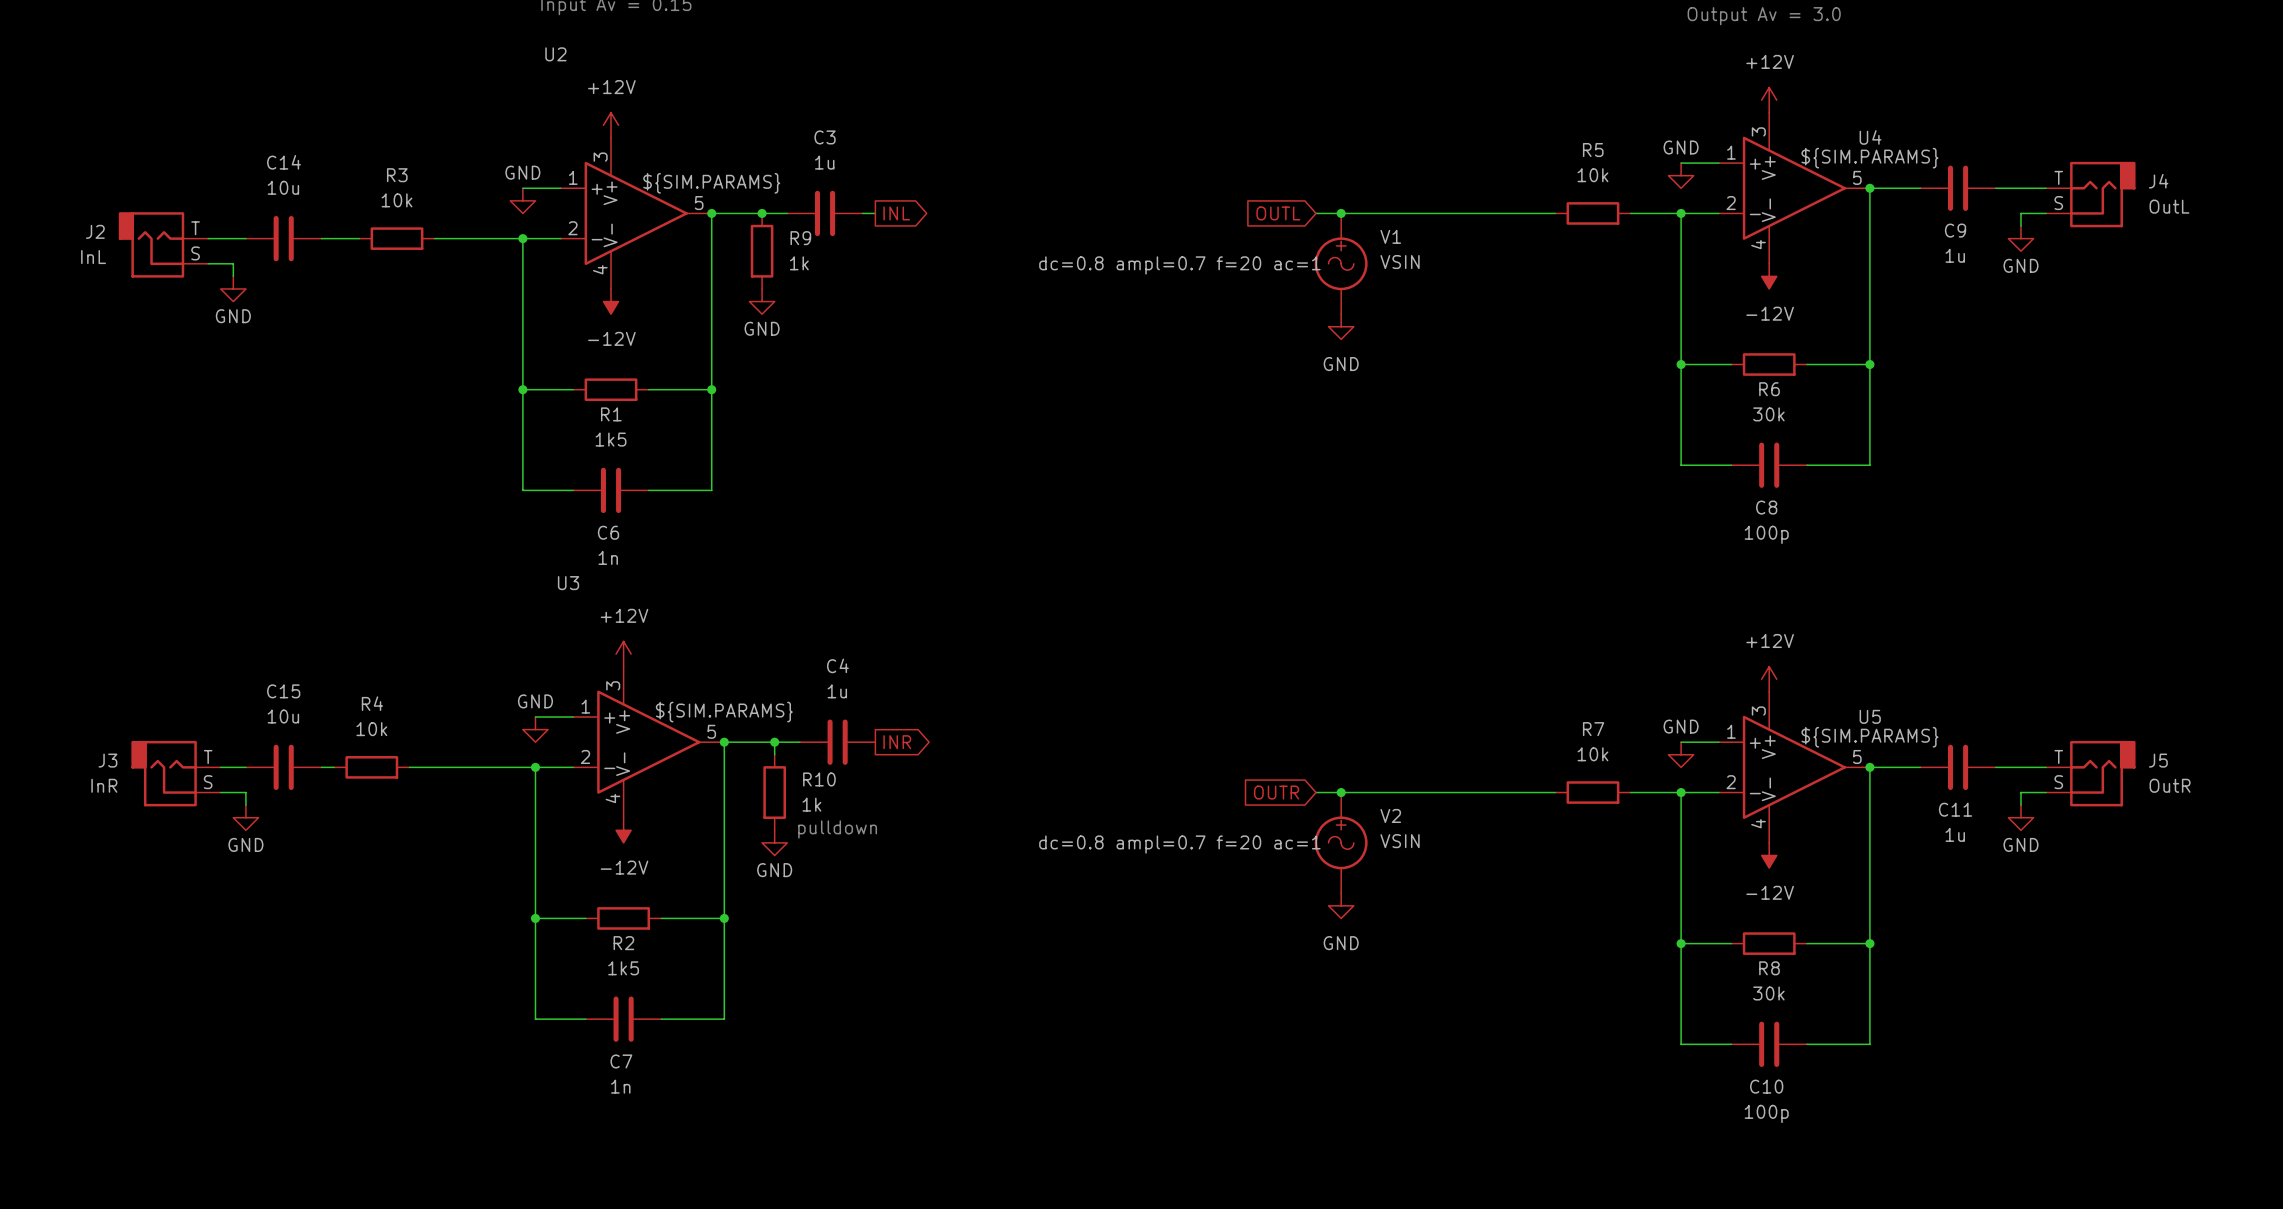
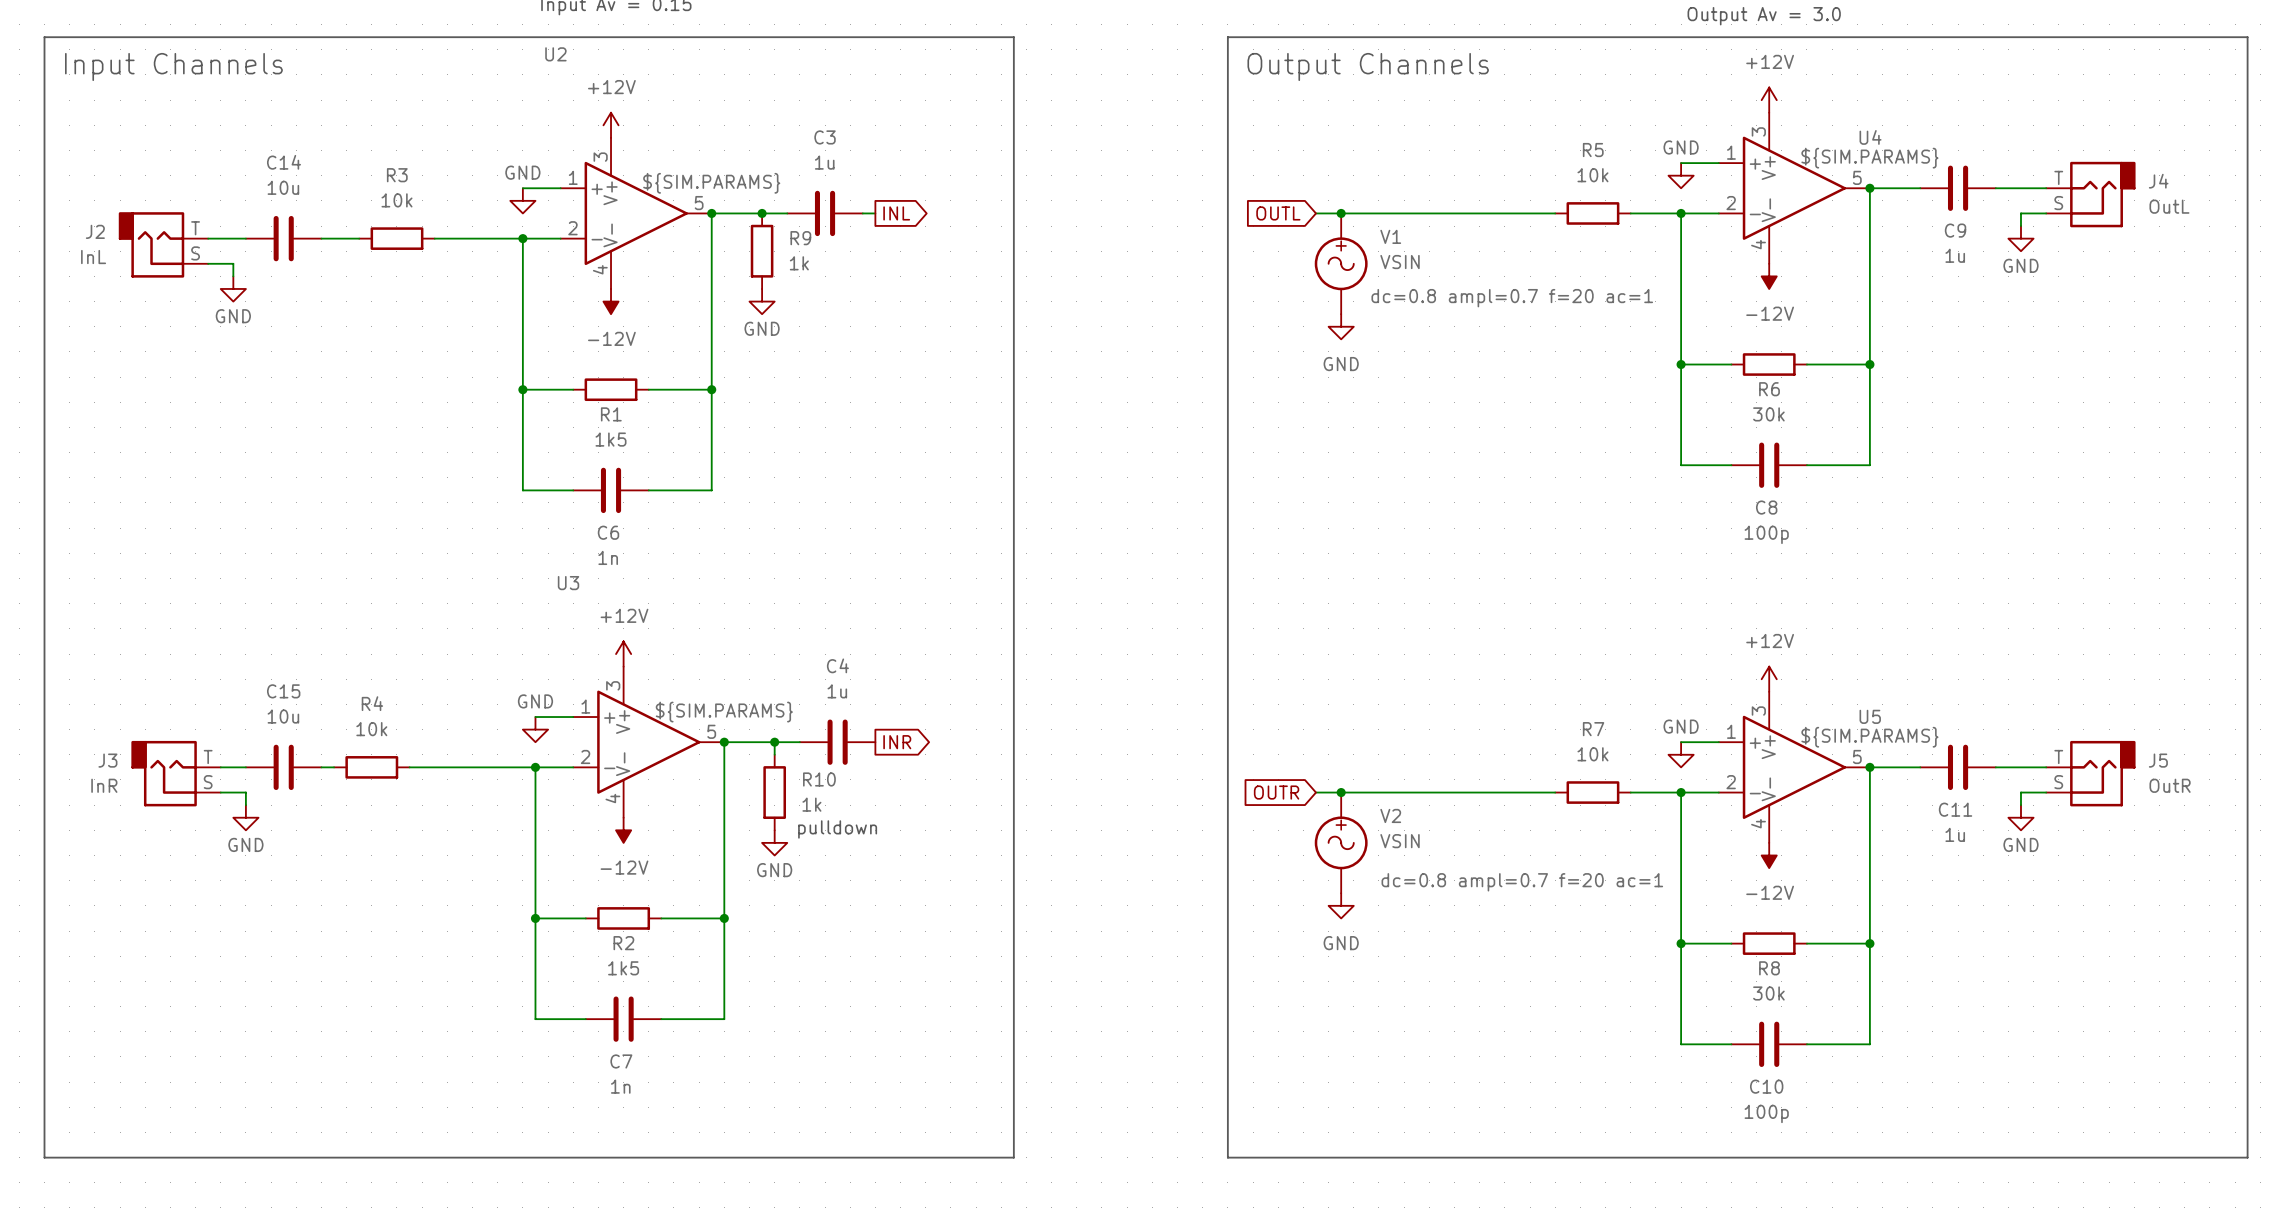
line: none -> (44, 37) (1013, 37) (1013, 1157) (44, 1157) (44, 37)
line: none -> (1227, 37) (2247, 37) (2247, 1157) (1227, 1157) (1227, 37)
text: none -> Input Channels (173, 66)
text: none -> Output Channels (1368, 66)
V1 text position: dc=0.8 ampl=0.7 f=20 ac=1 (1179, 265) -> dc=0.8 ampl=0.7 f=20 ac=1 (1512, 298)
V2 text position: dc=0.8 ampl=0.7 f=20 ac=1 (1179, 844) -> dc=0.8 ampl=0.7 f=20 ac=1 (1522, 882)

